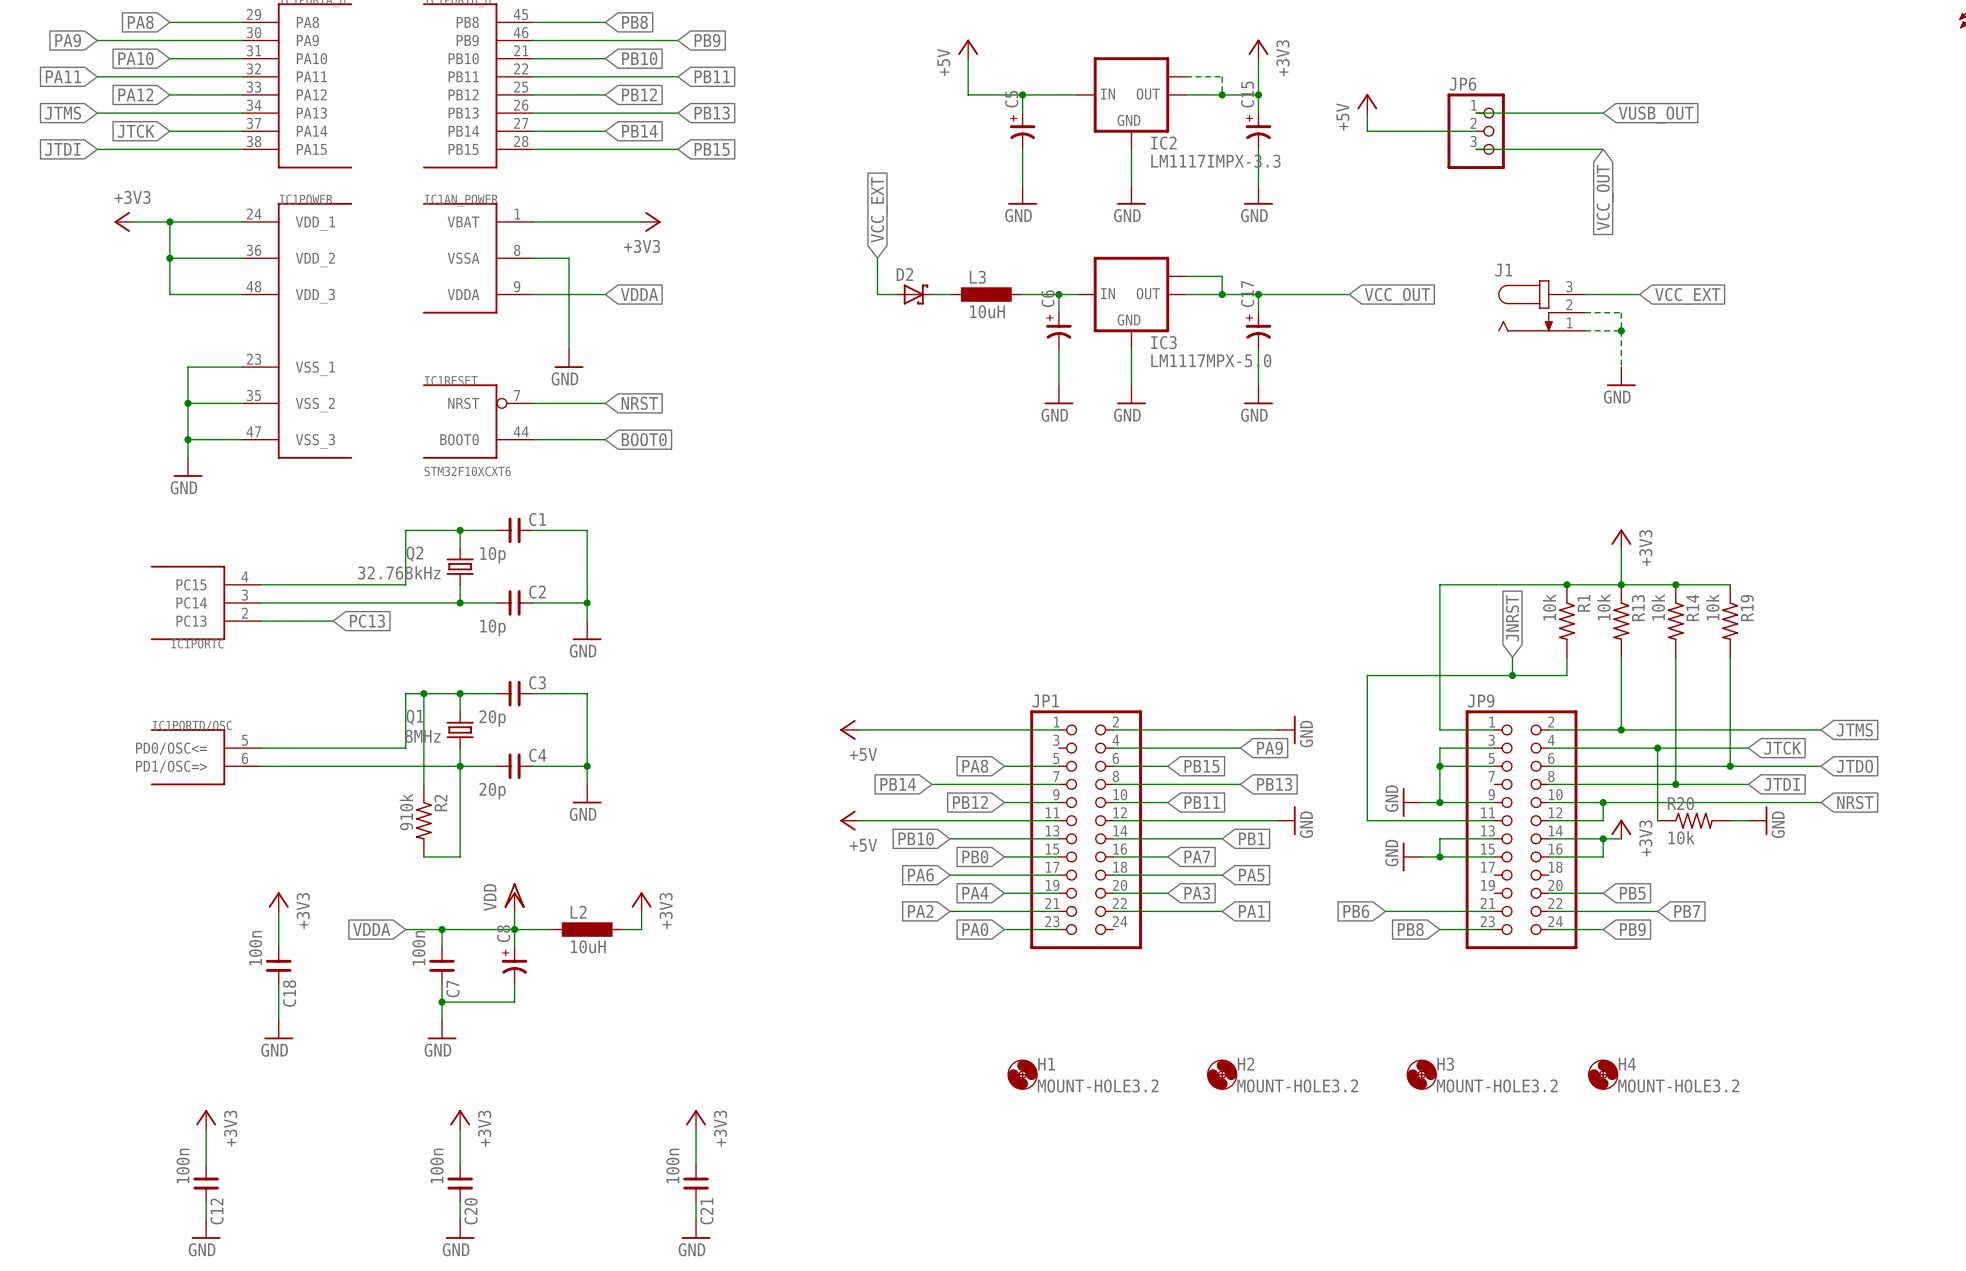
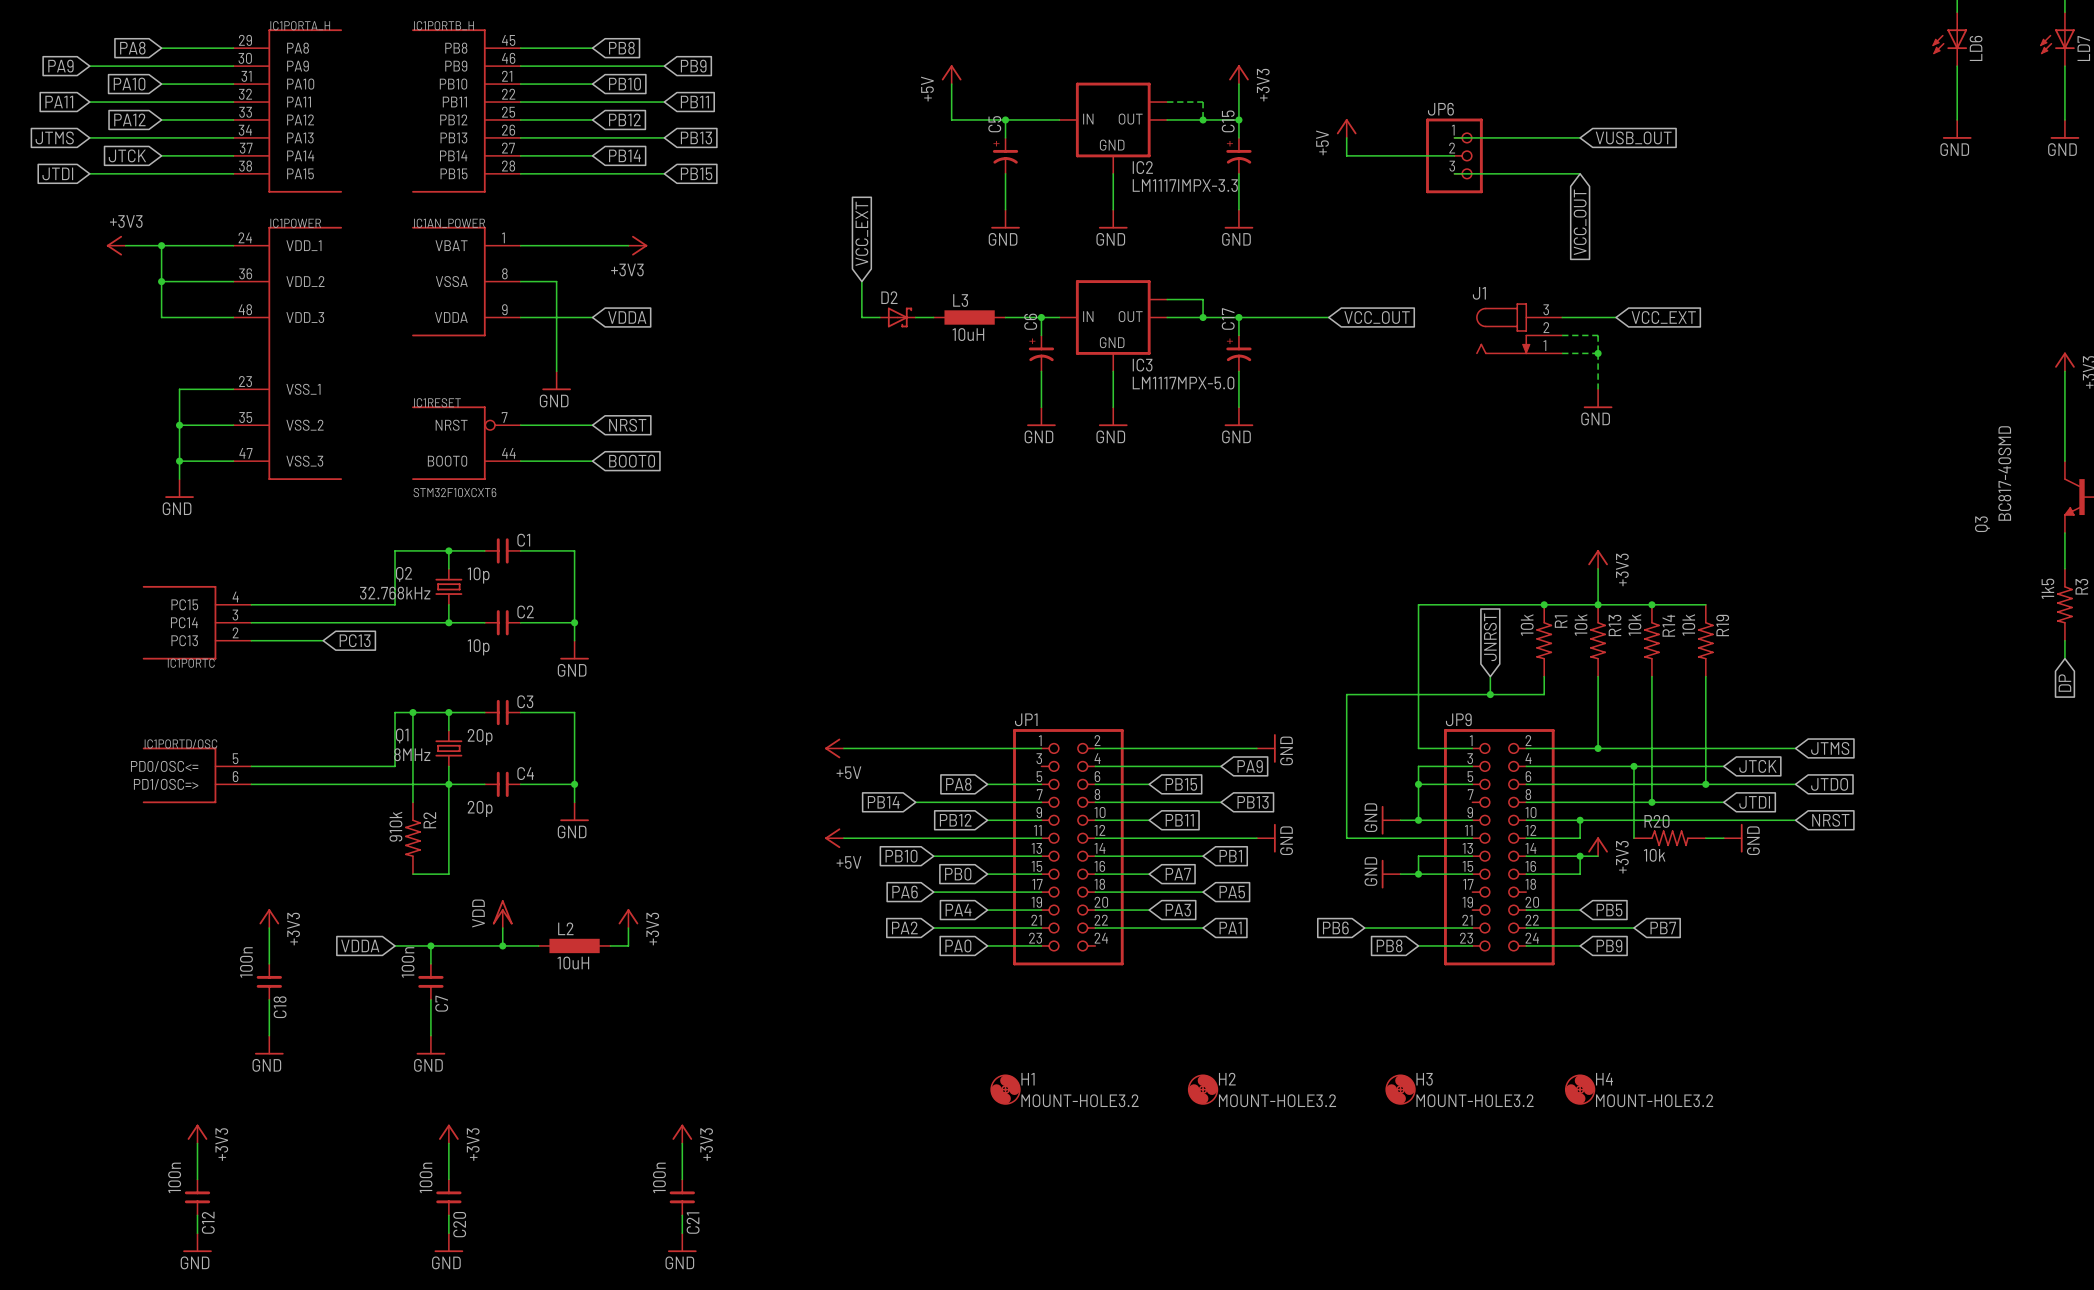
wire: (514, 929) (514, 947) -> none
C8: (514, 965) -> none
wire: (514, 983) (514, 1002) (442, 1002) -> none
junction: (442, 1002) -> none

